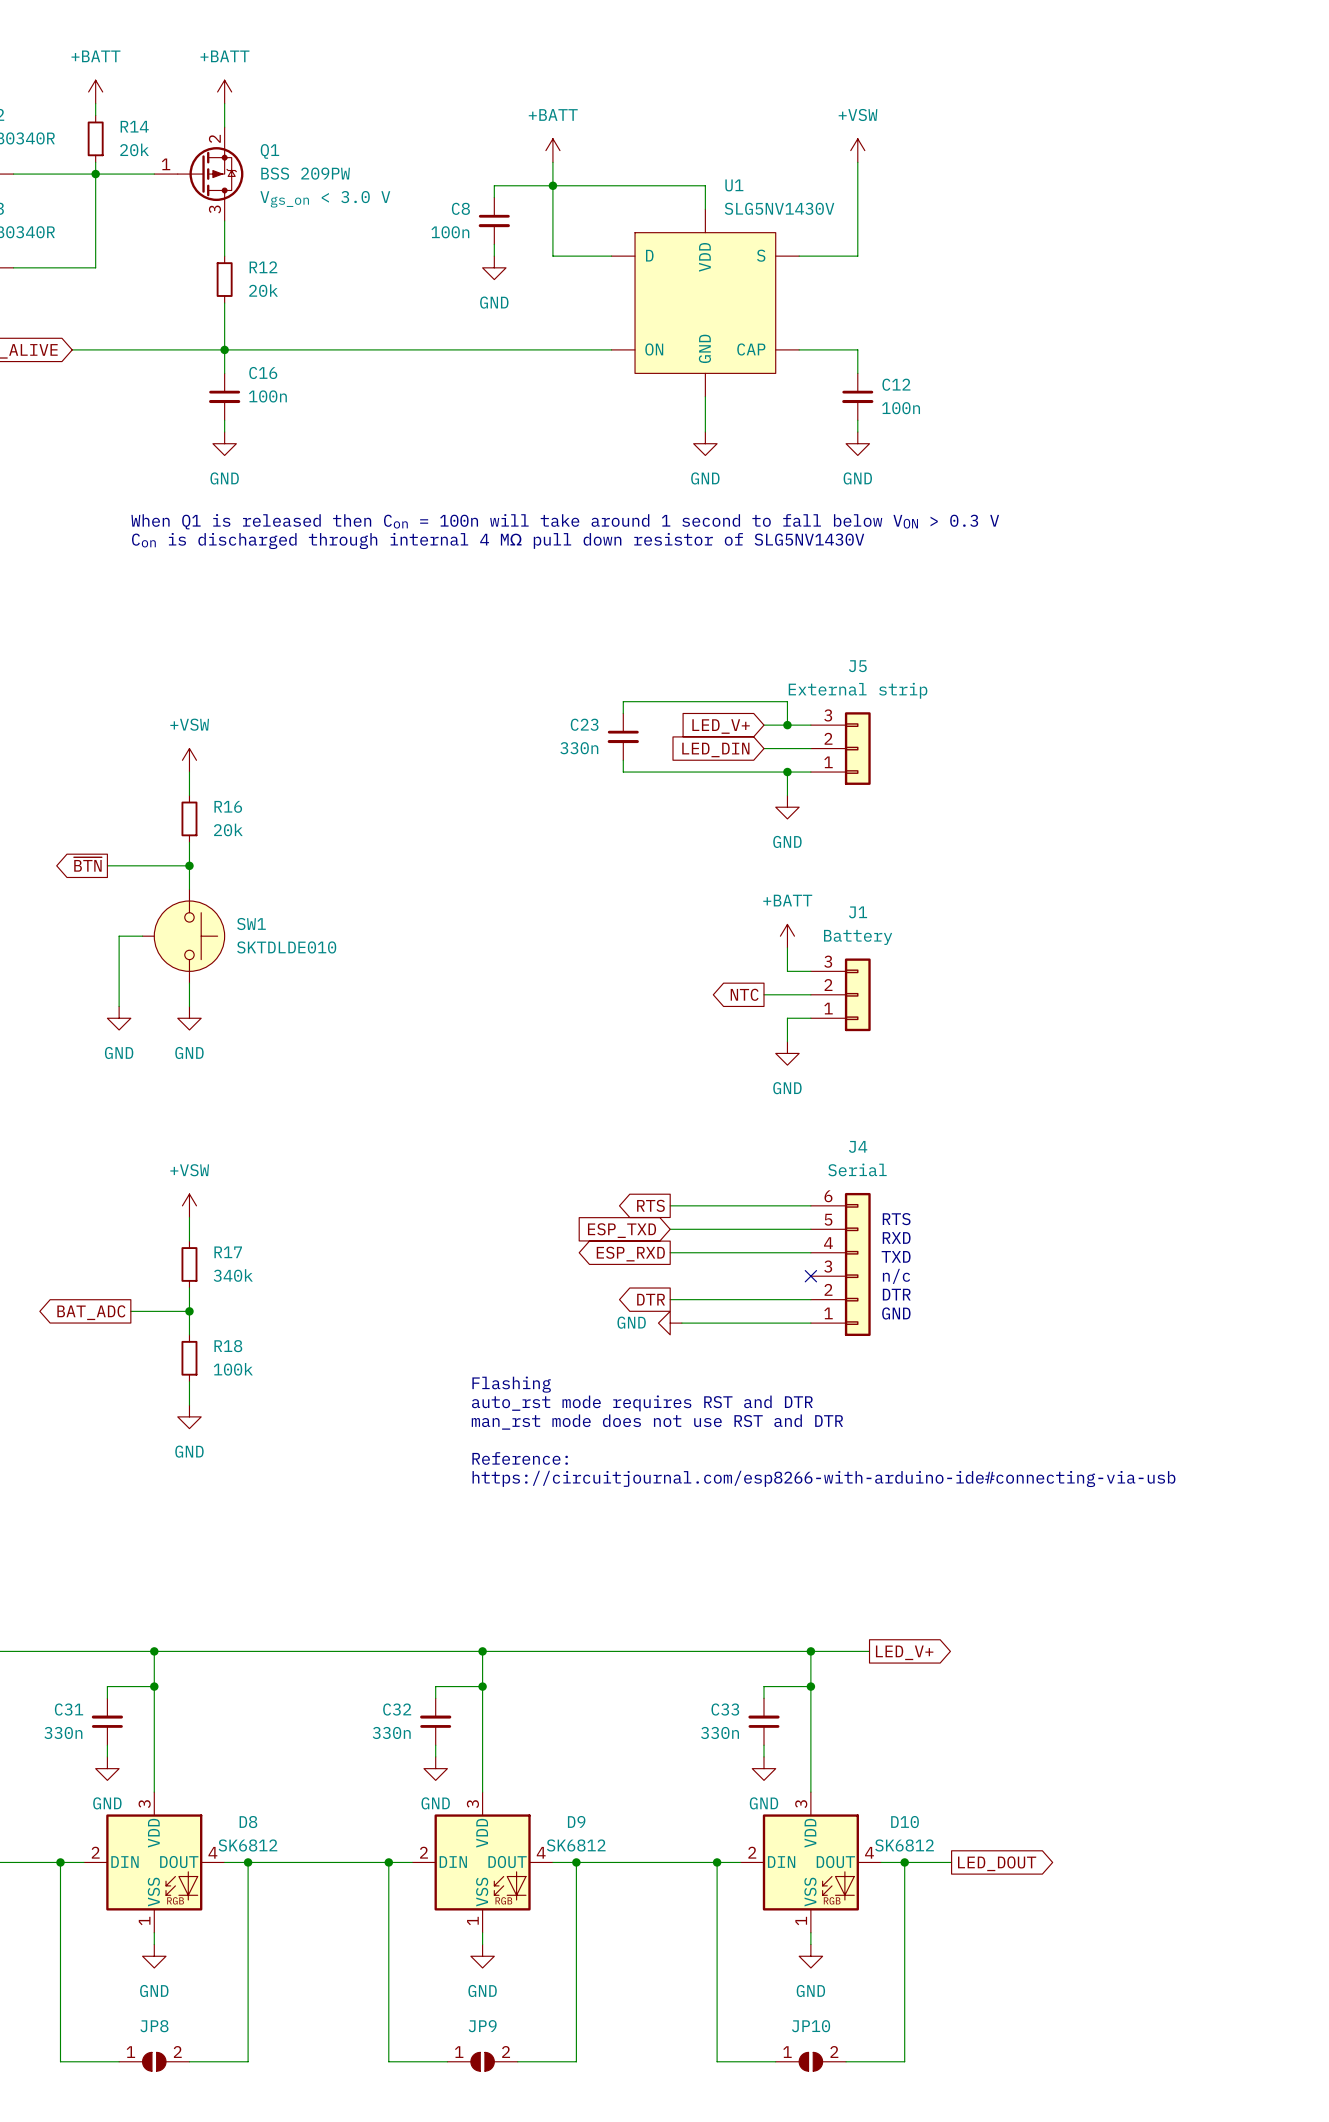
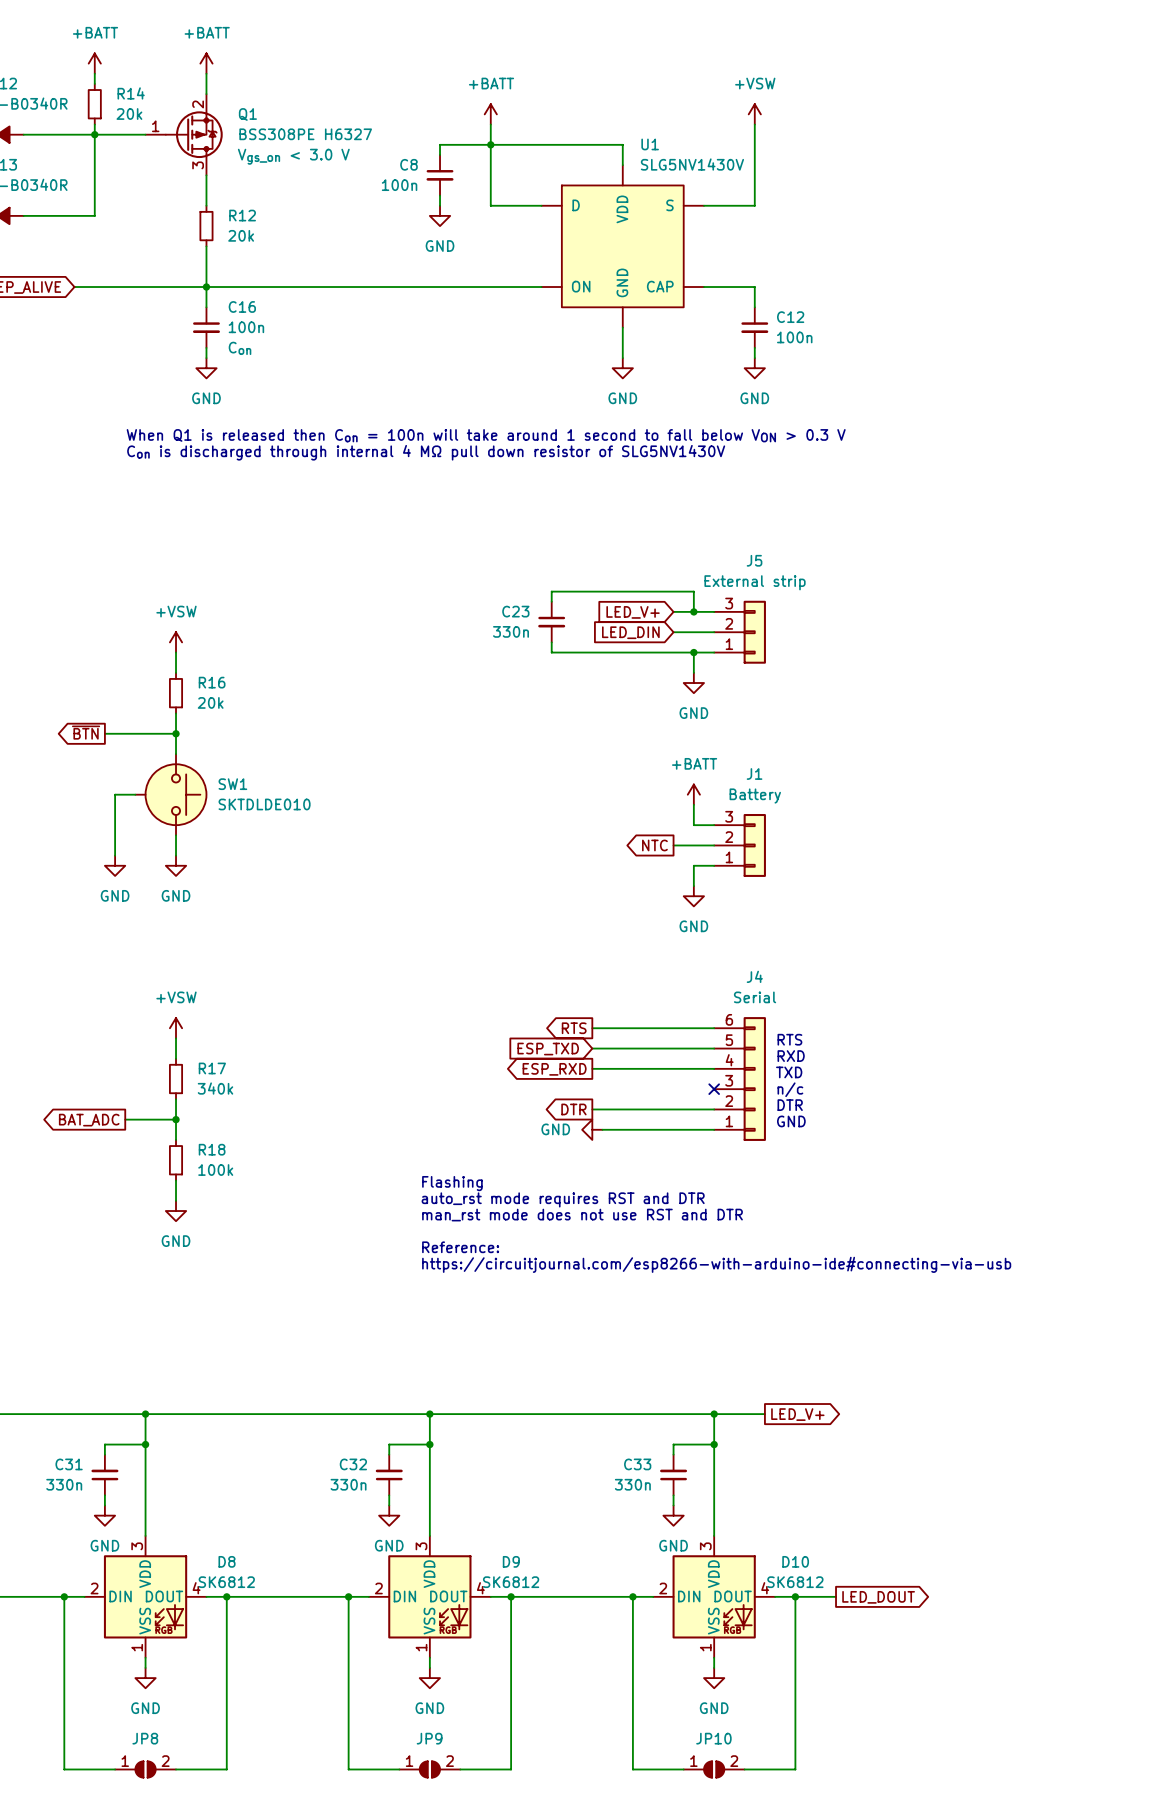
Q1 value: BSS 209PW (305, 173) -> BSS308PE H6327 (305, 134)
C16 text: none -> Con (240, 348)

